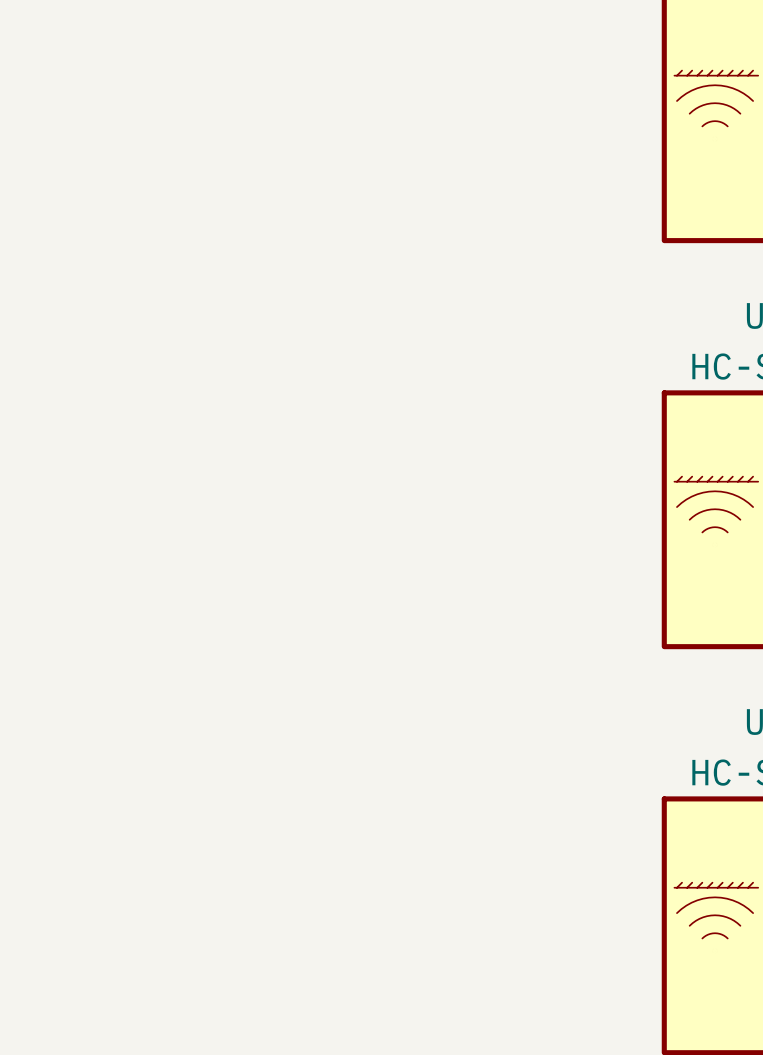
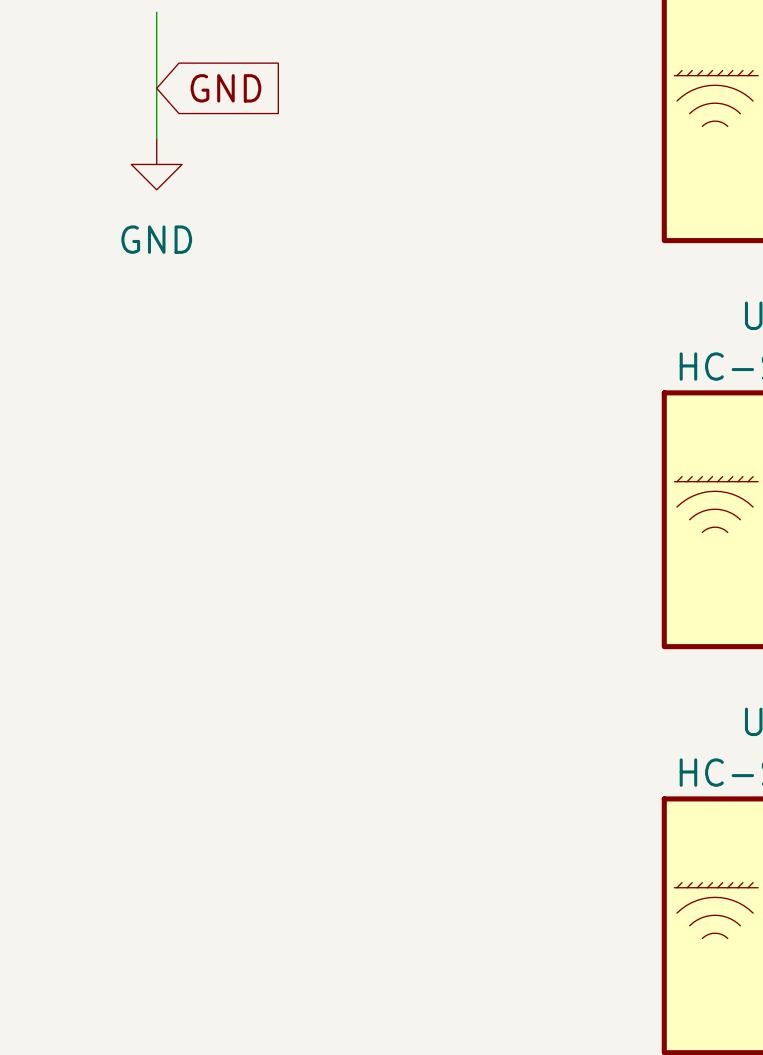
wire: none -> (156, 12) (156, 139)
global label: none -> GND (225, 88)
power symbol: none -> GND (156, 164)

